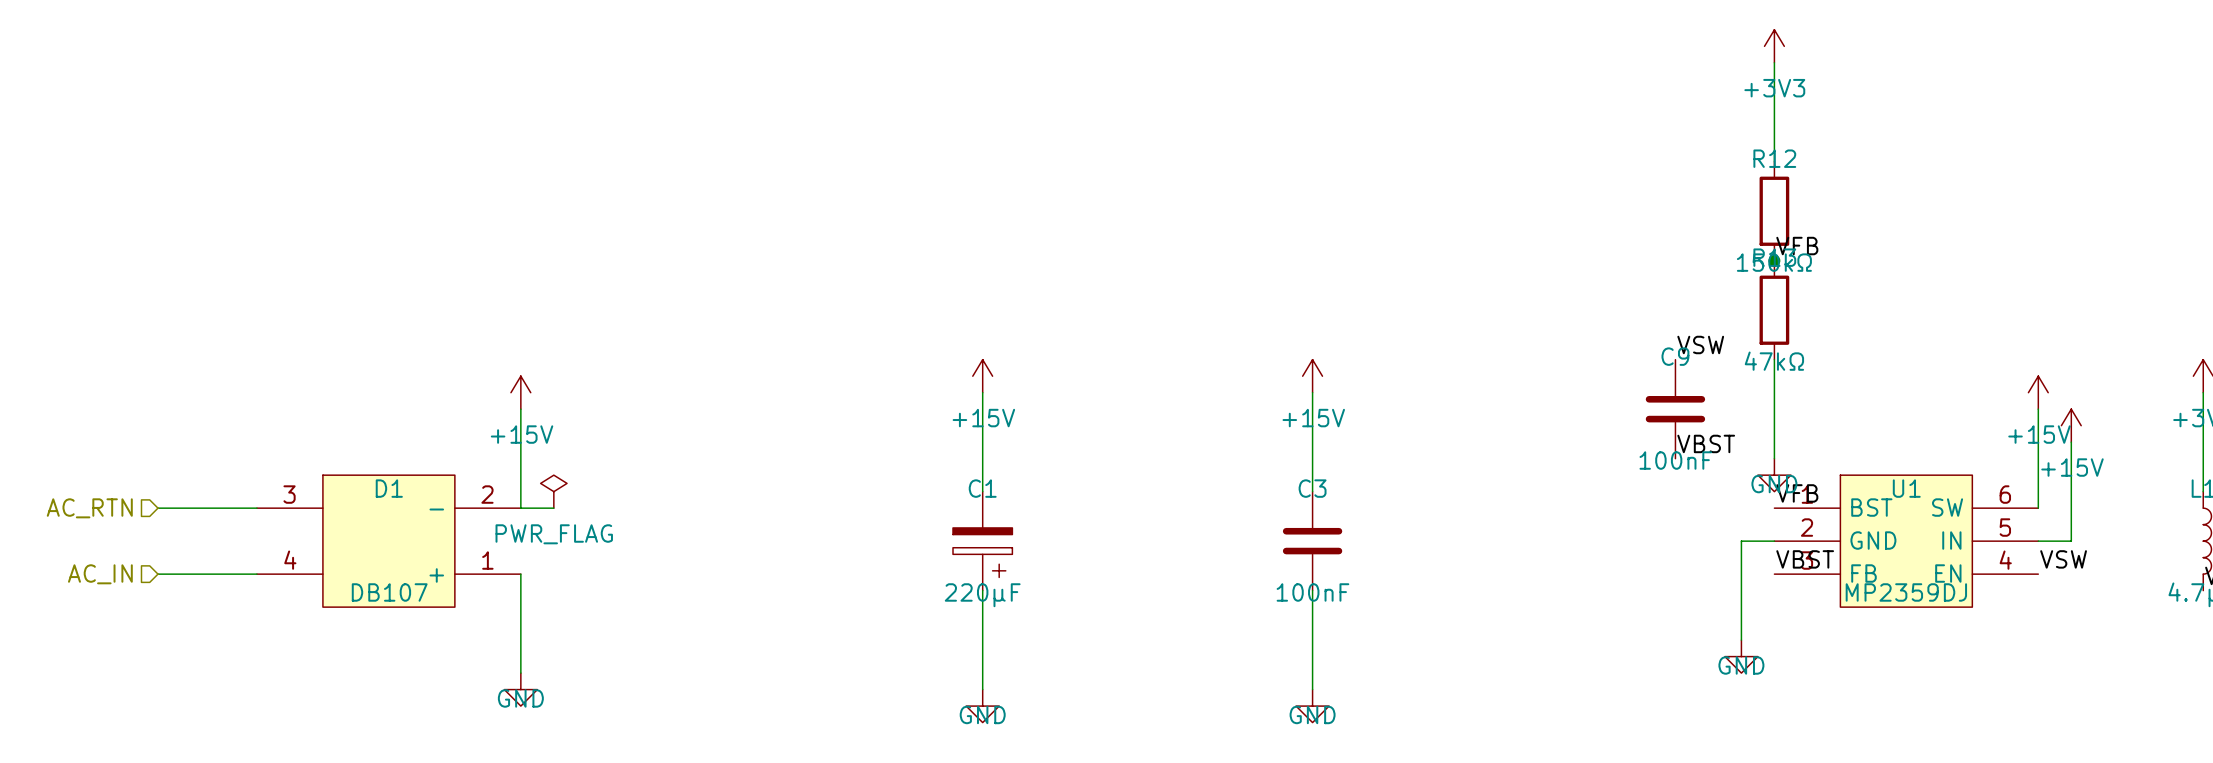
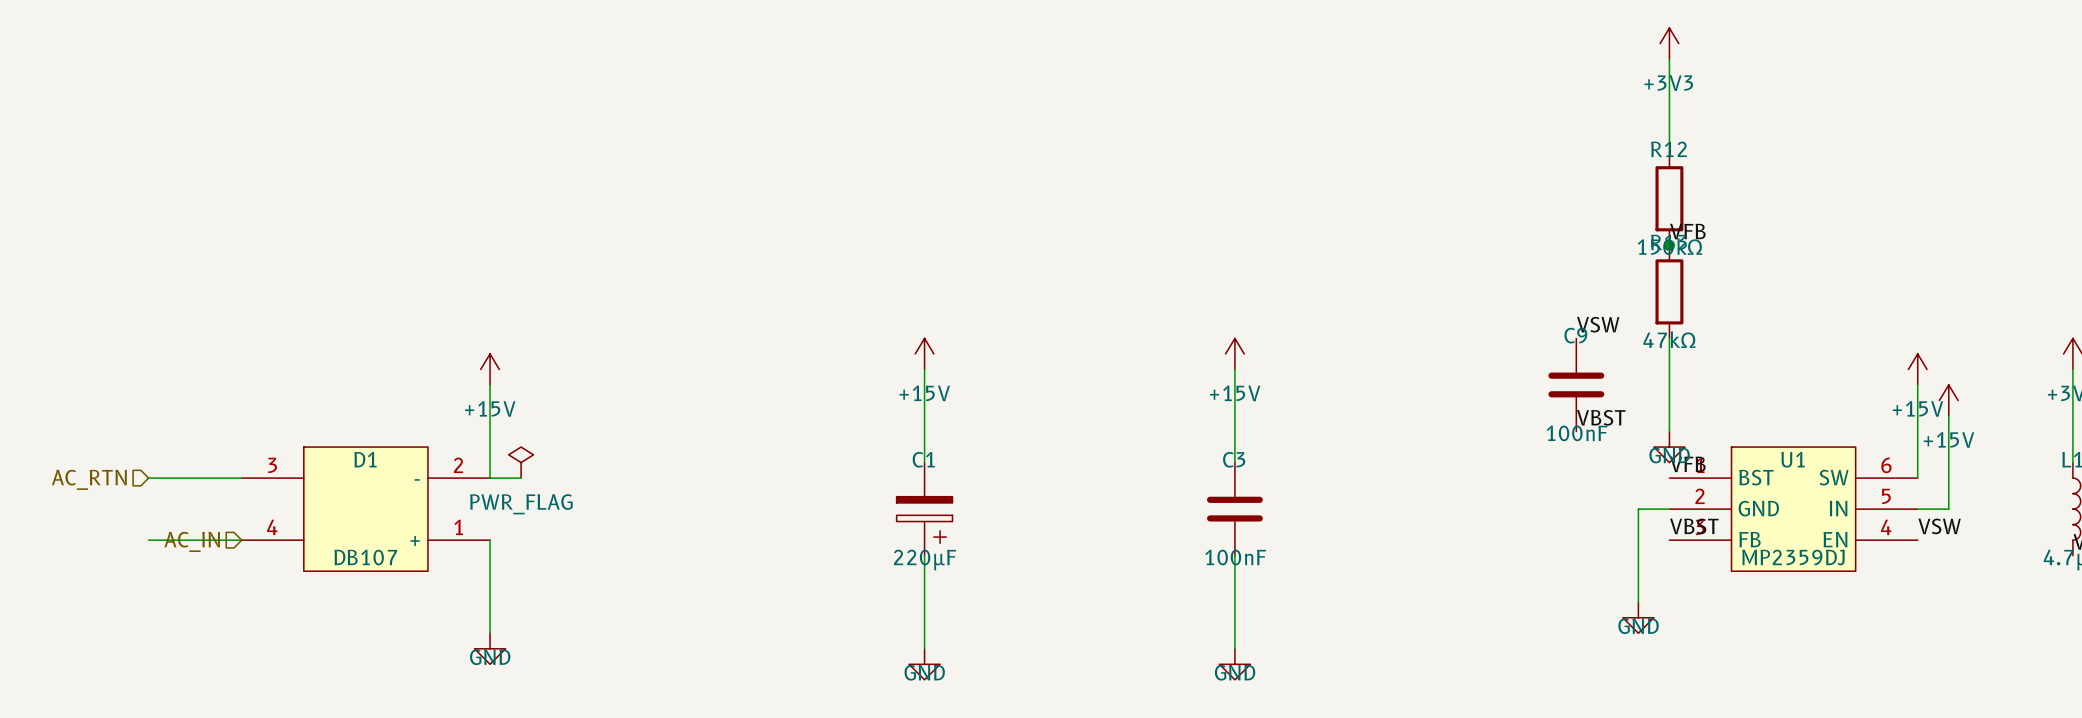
hierarchical label position: AC_IN (100, 574) -> AC_IN (192, 541)

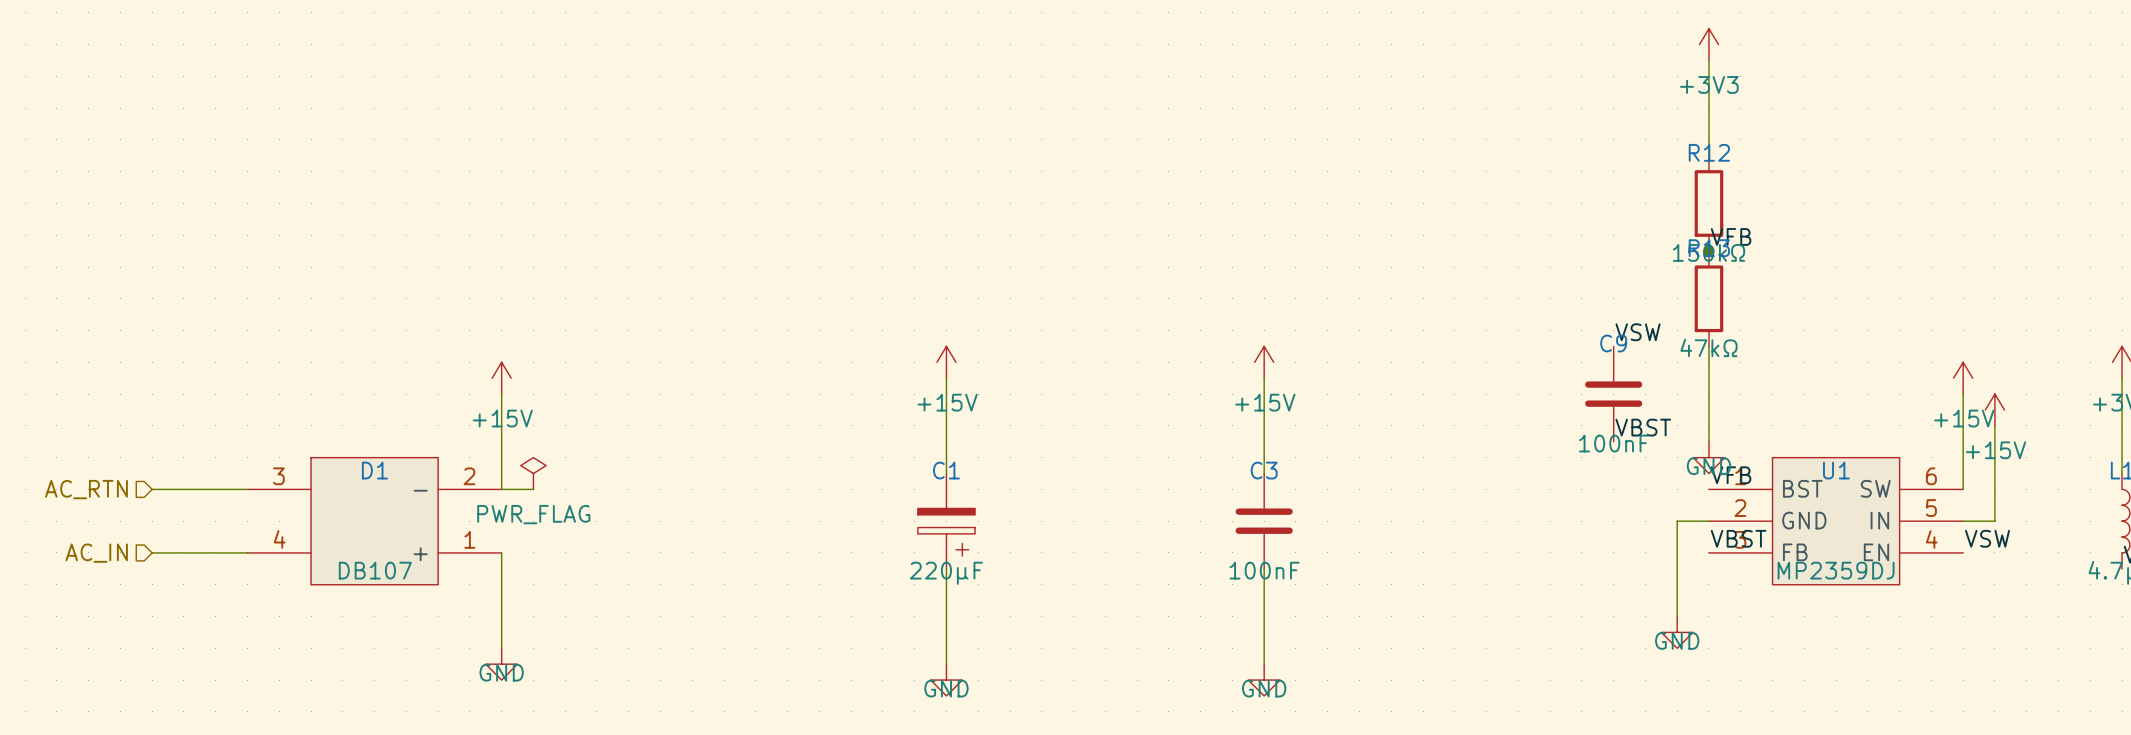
hierarchical label position: AC_IN (192, 541) -> AC_IN (96, 553)

